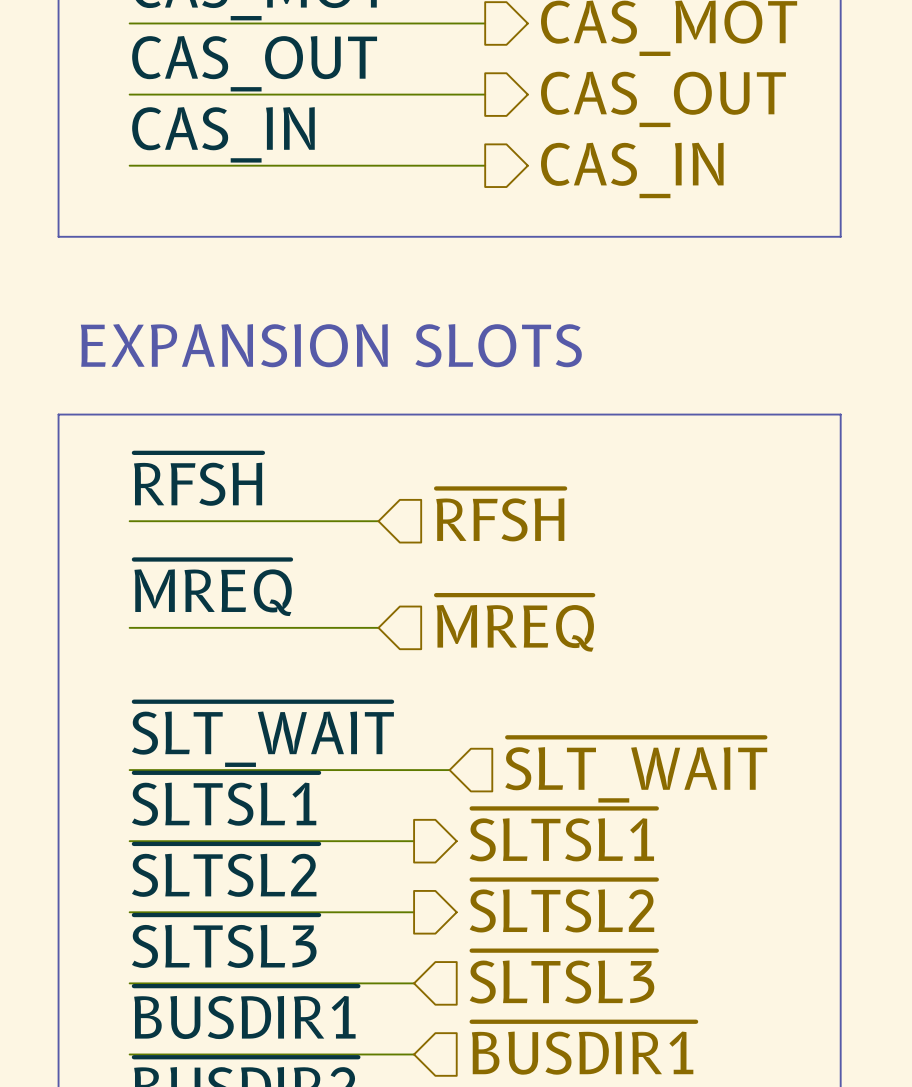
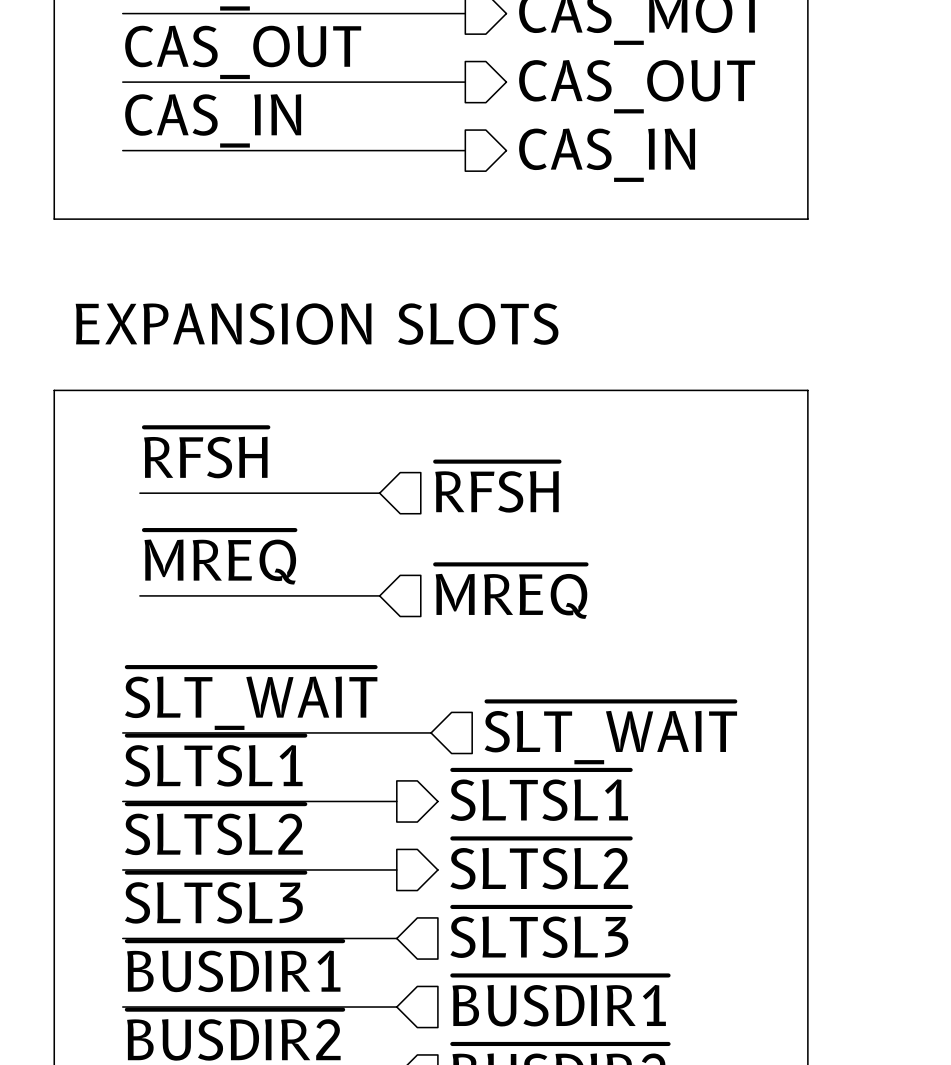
label position: ~{RFSH} (198, 479) -> ~{RFSH} (206, 452)
hierarchical label position: ~{RFSH} (500, 514) -> ~{RFSH} (497, 487)
wire: (129, 521) (147, 521) -> (362, 493) (379, 493)
label position: ~{MREQ} (212, 587) -> ~{MREQ} (220, 557)
hierarchical label position: ~{MREQ} (515, 623) -> ~{MREQ} (511, 591)
wire: (129, 627) (147, 627) -> (362, 595) (379, 595)

